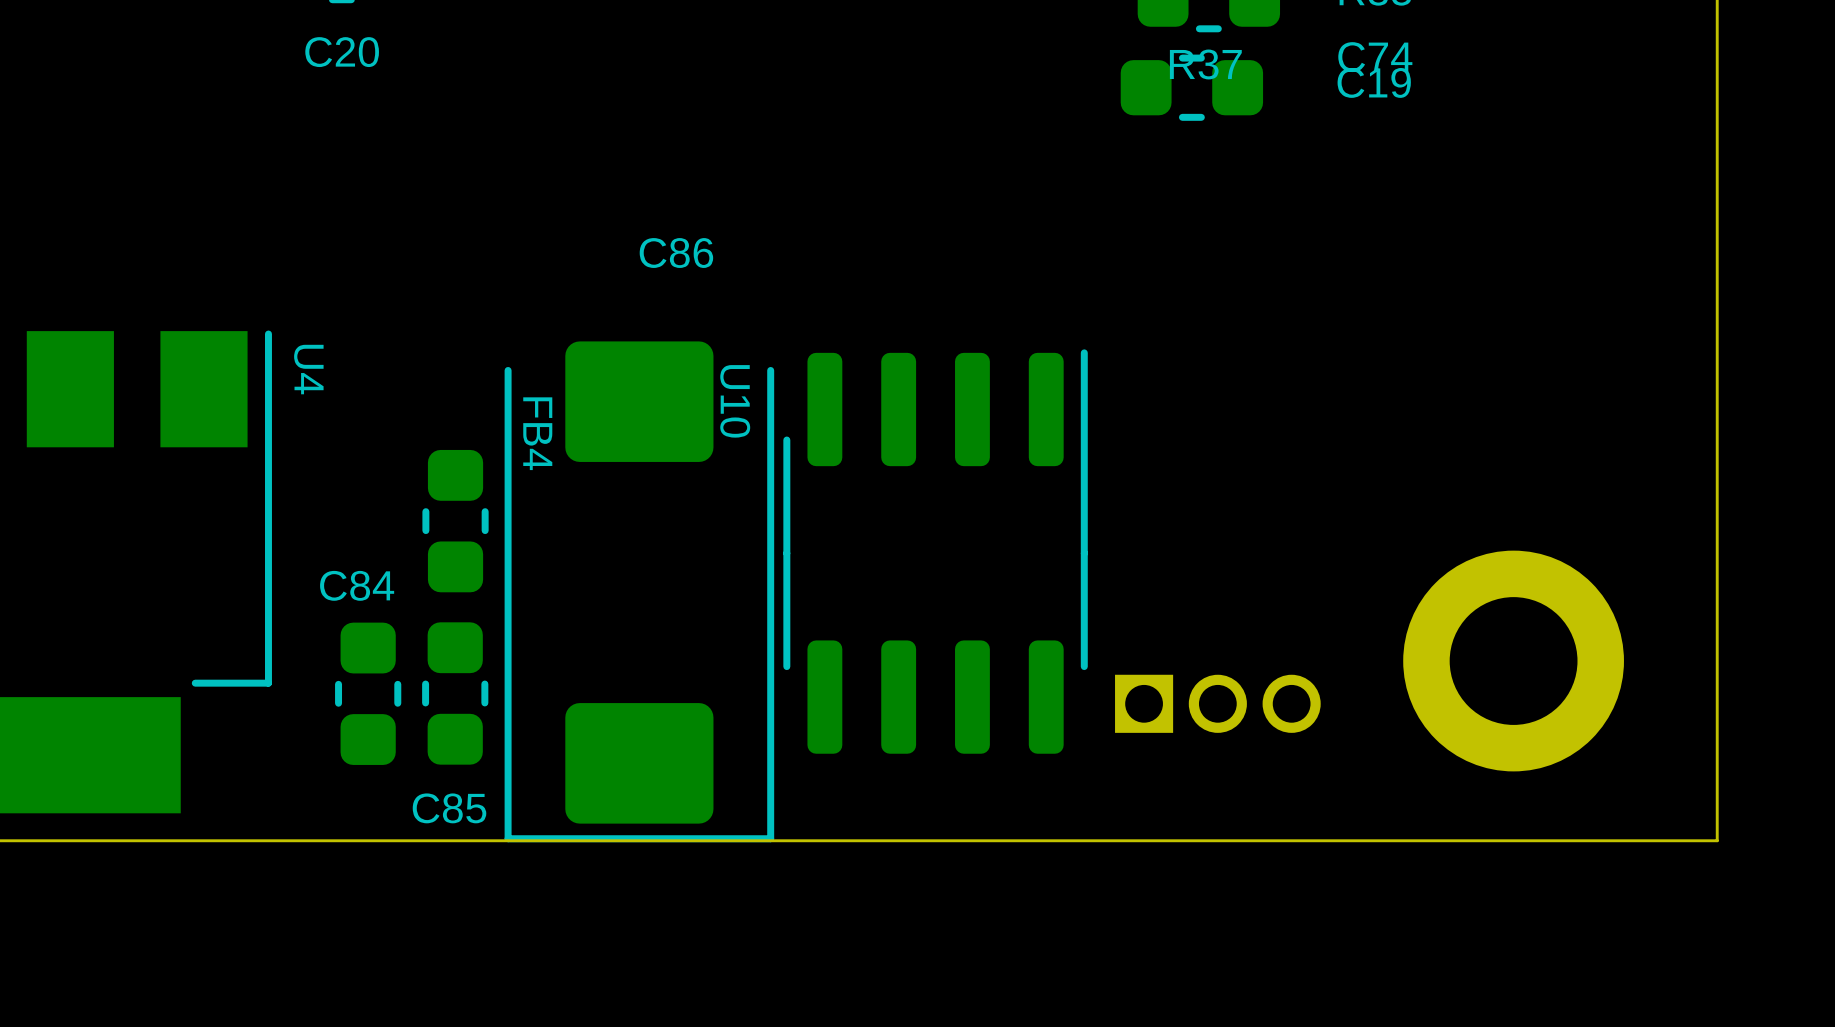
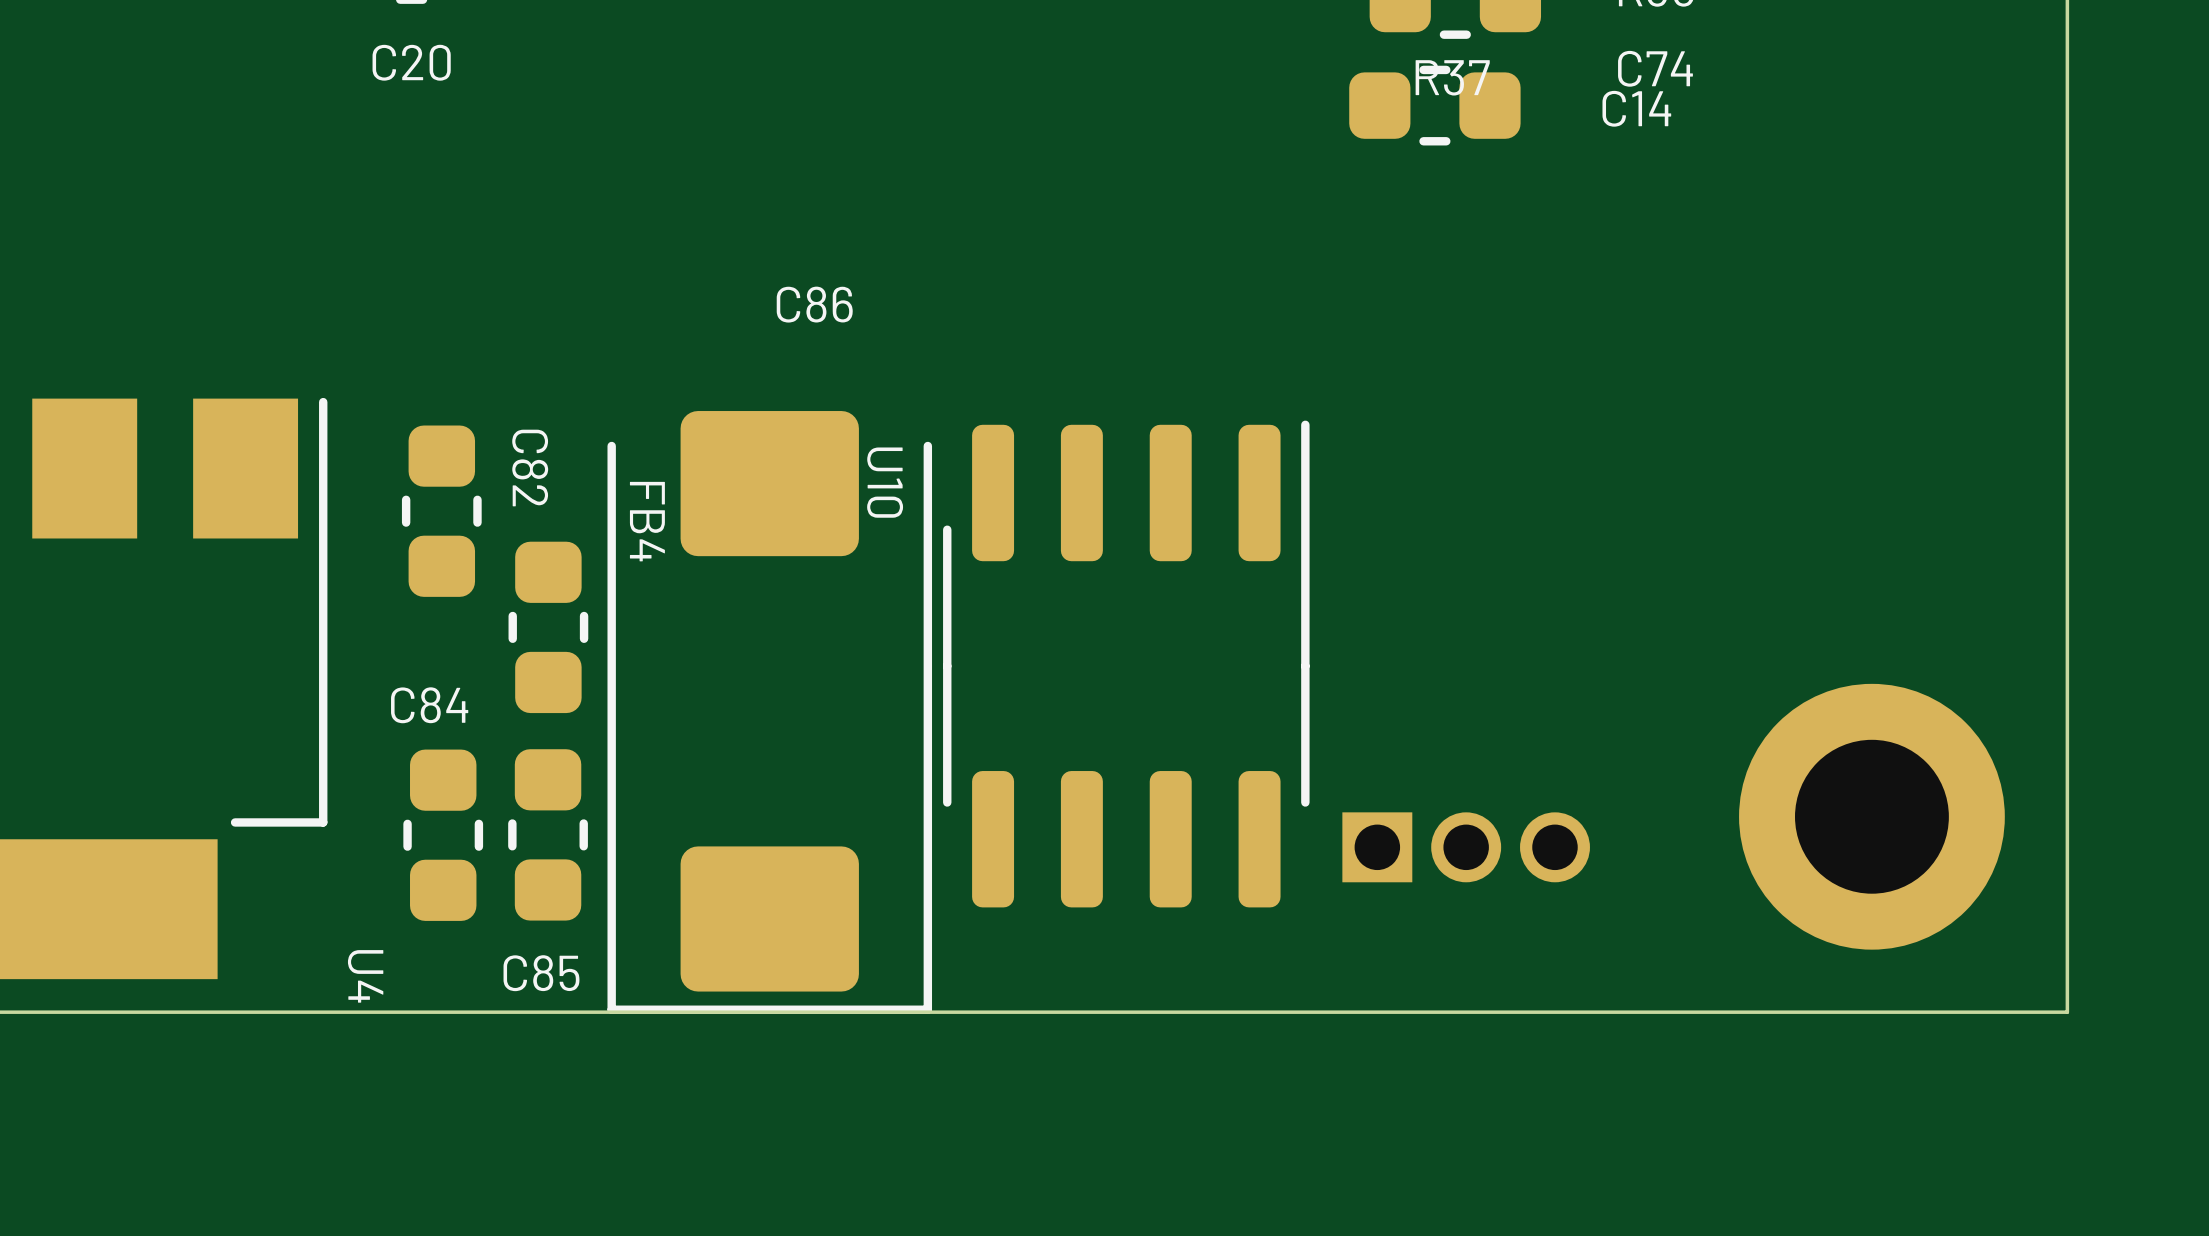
C19 name: C19 (1374, 82) -> C14 (1636, 108)
U4 name position: U4 (308, 369) -> U4 (365, 976)
C82: none -> (441, 511)
part position: (1513, 661) -> (1871, 816)

